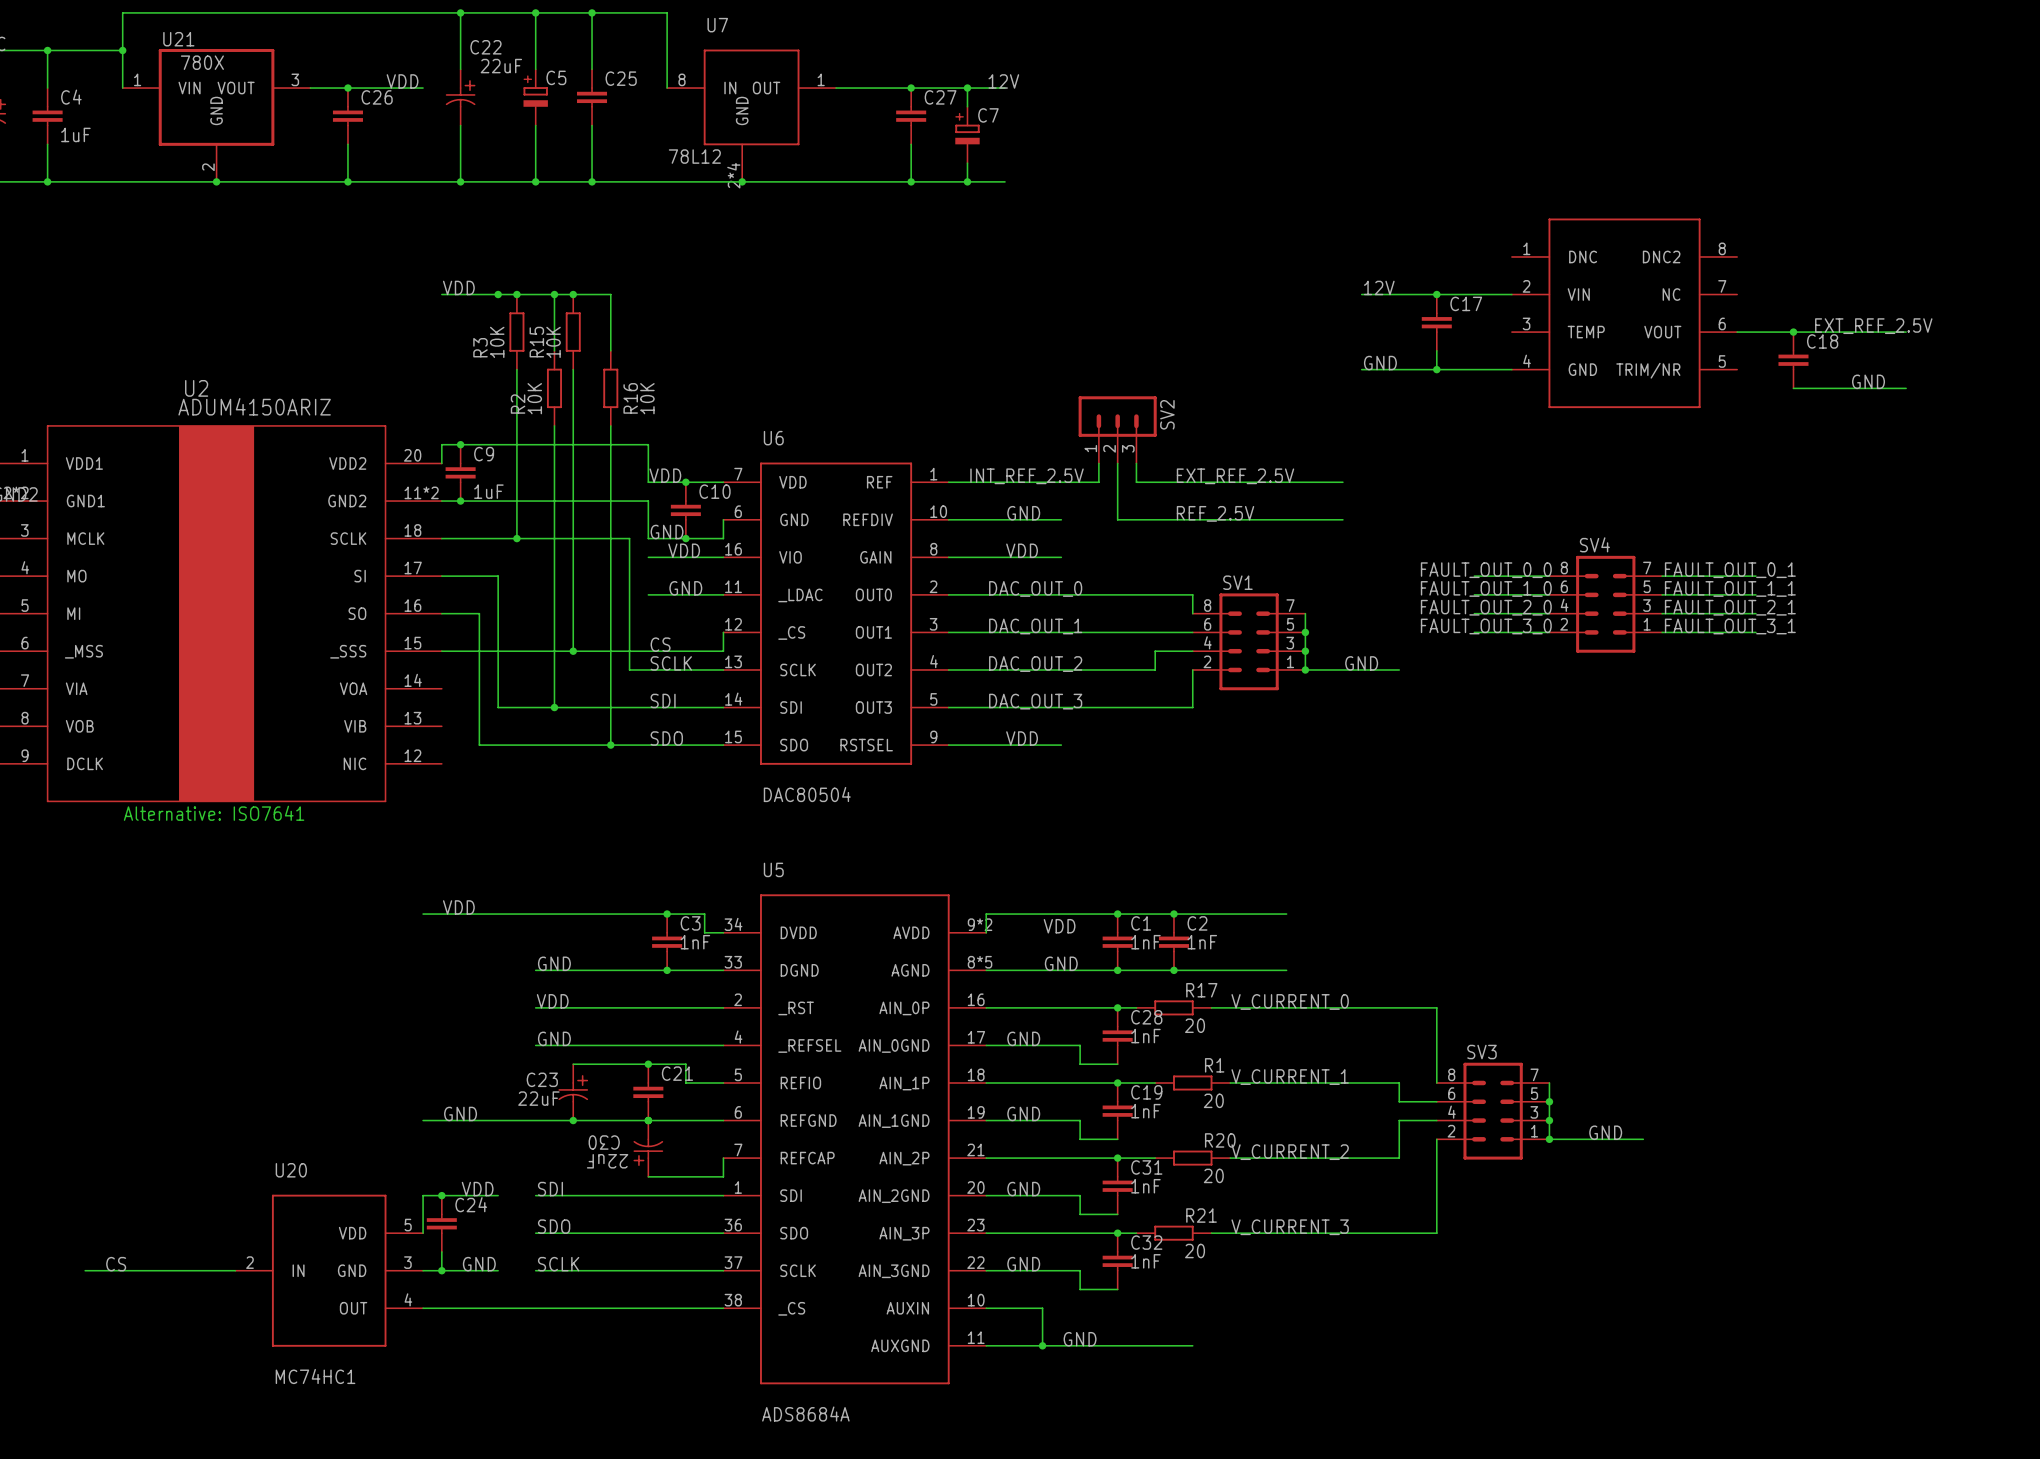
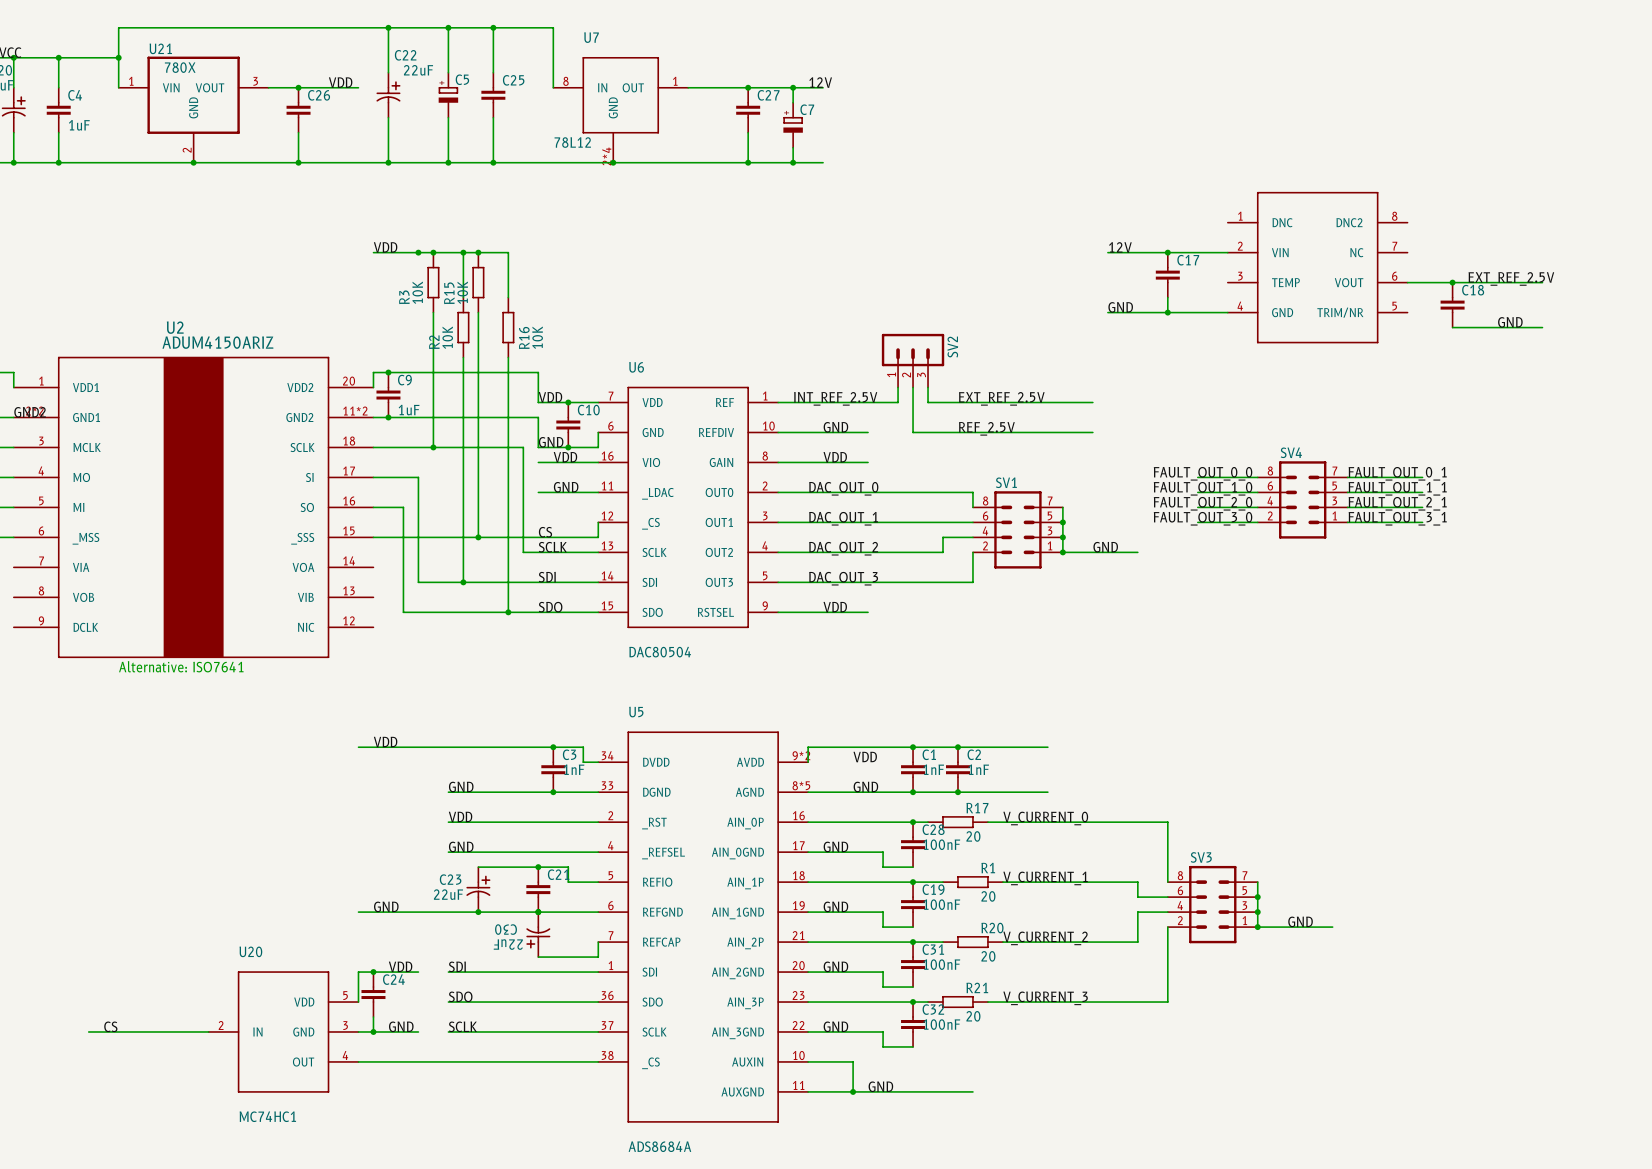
C28 value: 1nF (1145, 1036) -> 100nF (941, 844)
C19 value: 1nF (1145, 1111) -> 100nF (941, 904)
C31 value: 1nF (1145, 1186) -> 100nF (941, 964)
C32 value: 1nF (1145, 1261) -> 100nF (941, 1024)

